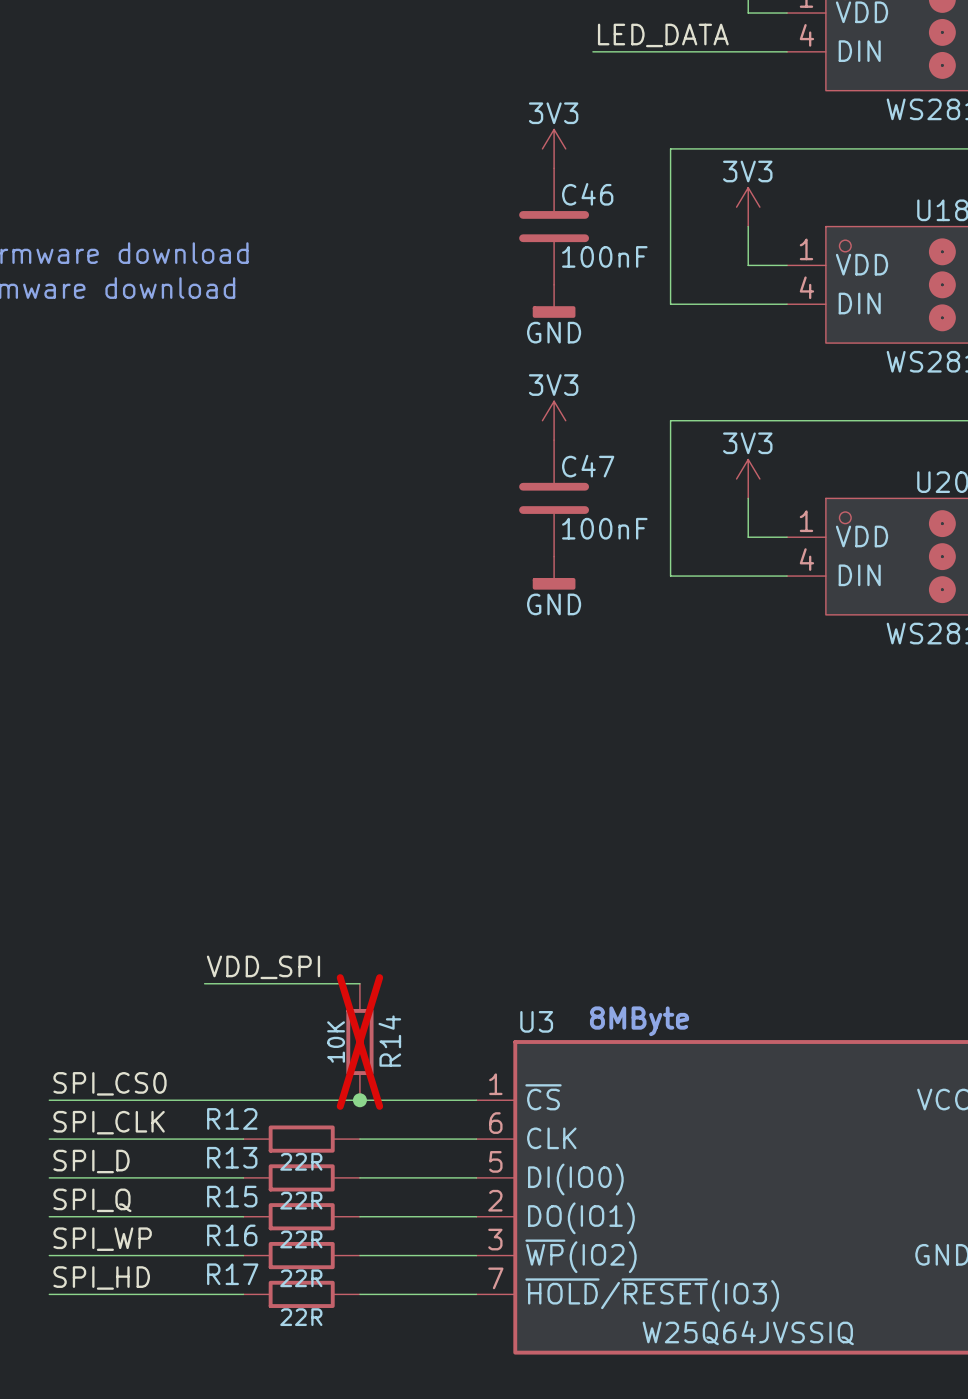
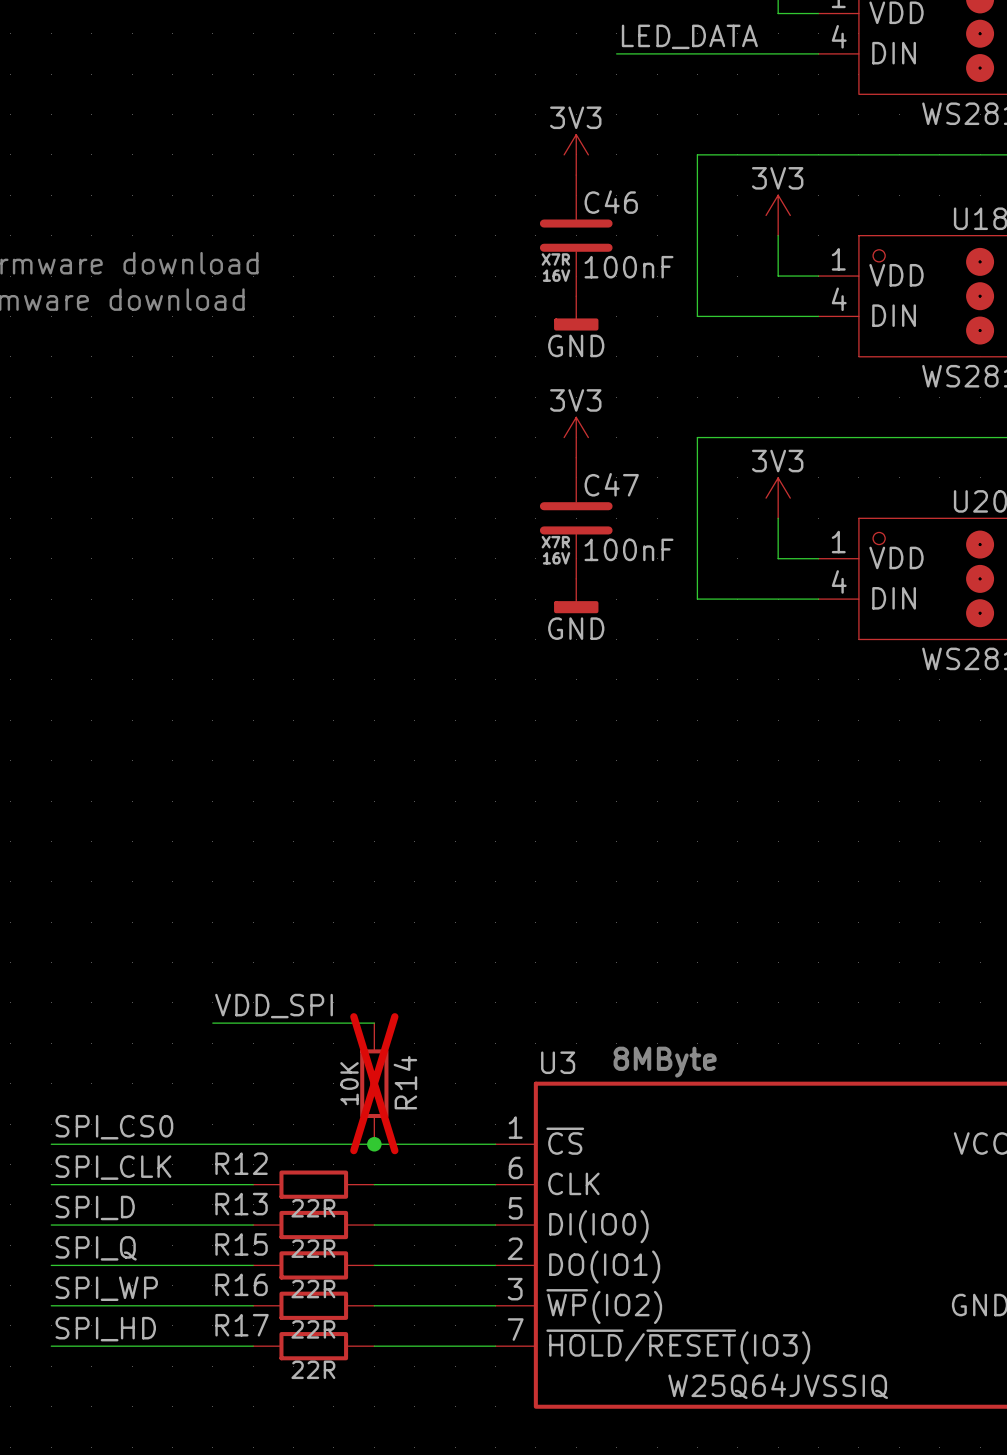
C46 text: none -> X7R (555, 259)
C46 text: none -> 16V (556, 275)
C47 text: none -> X7R (555, 542)
C47 text: none -> 16V (556, 558)

